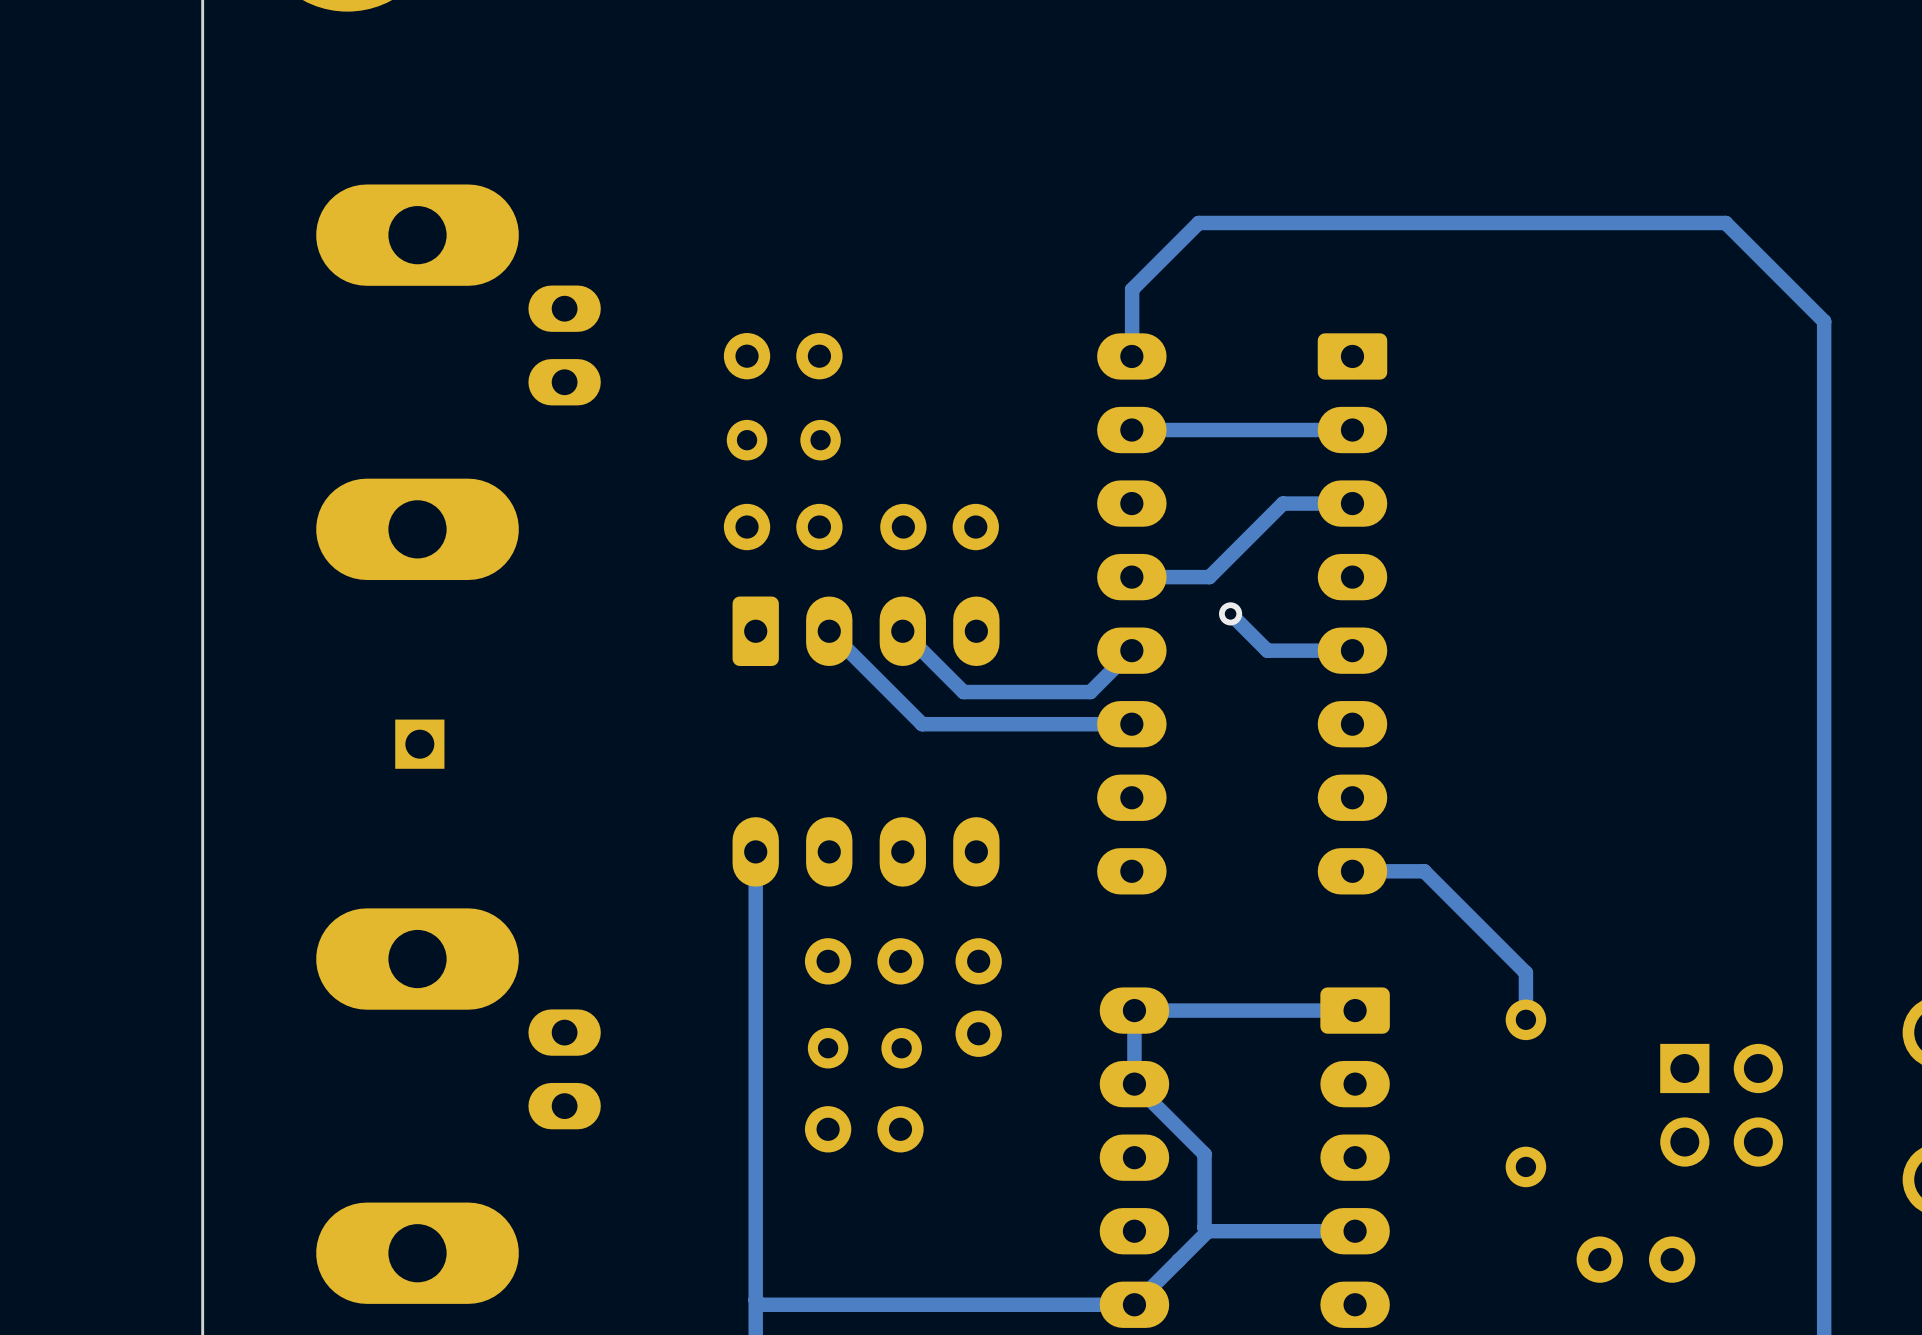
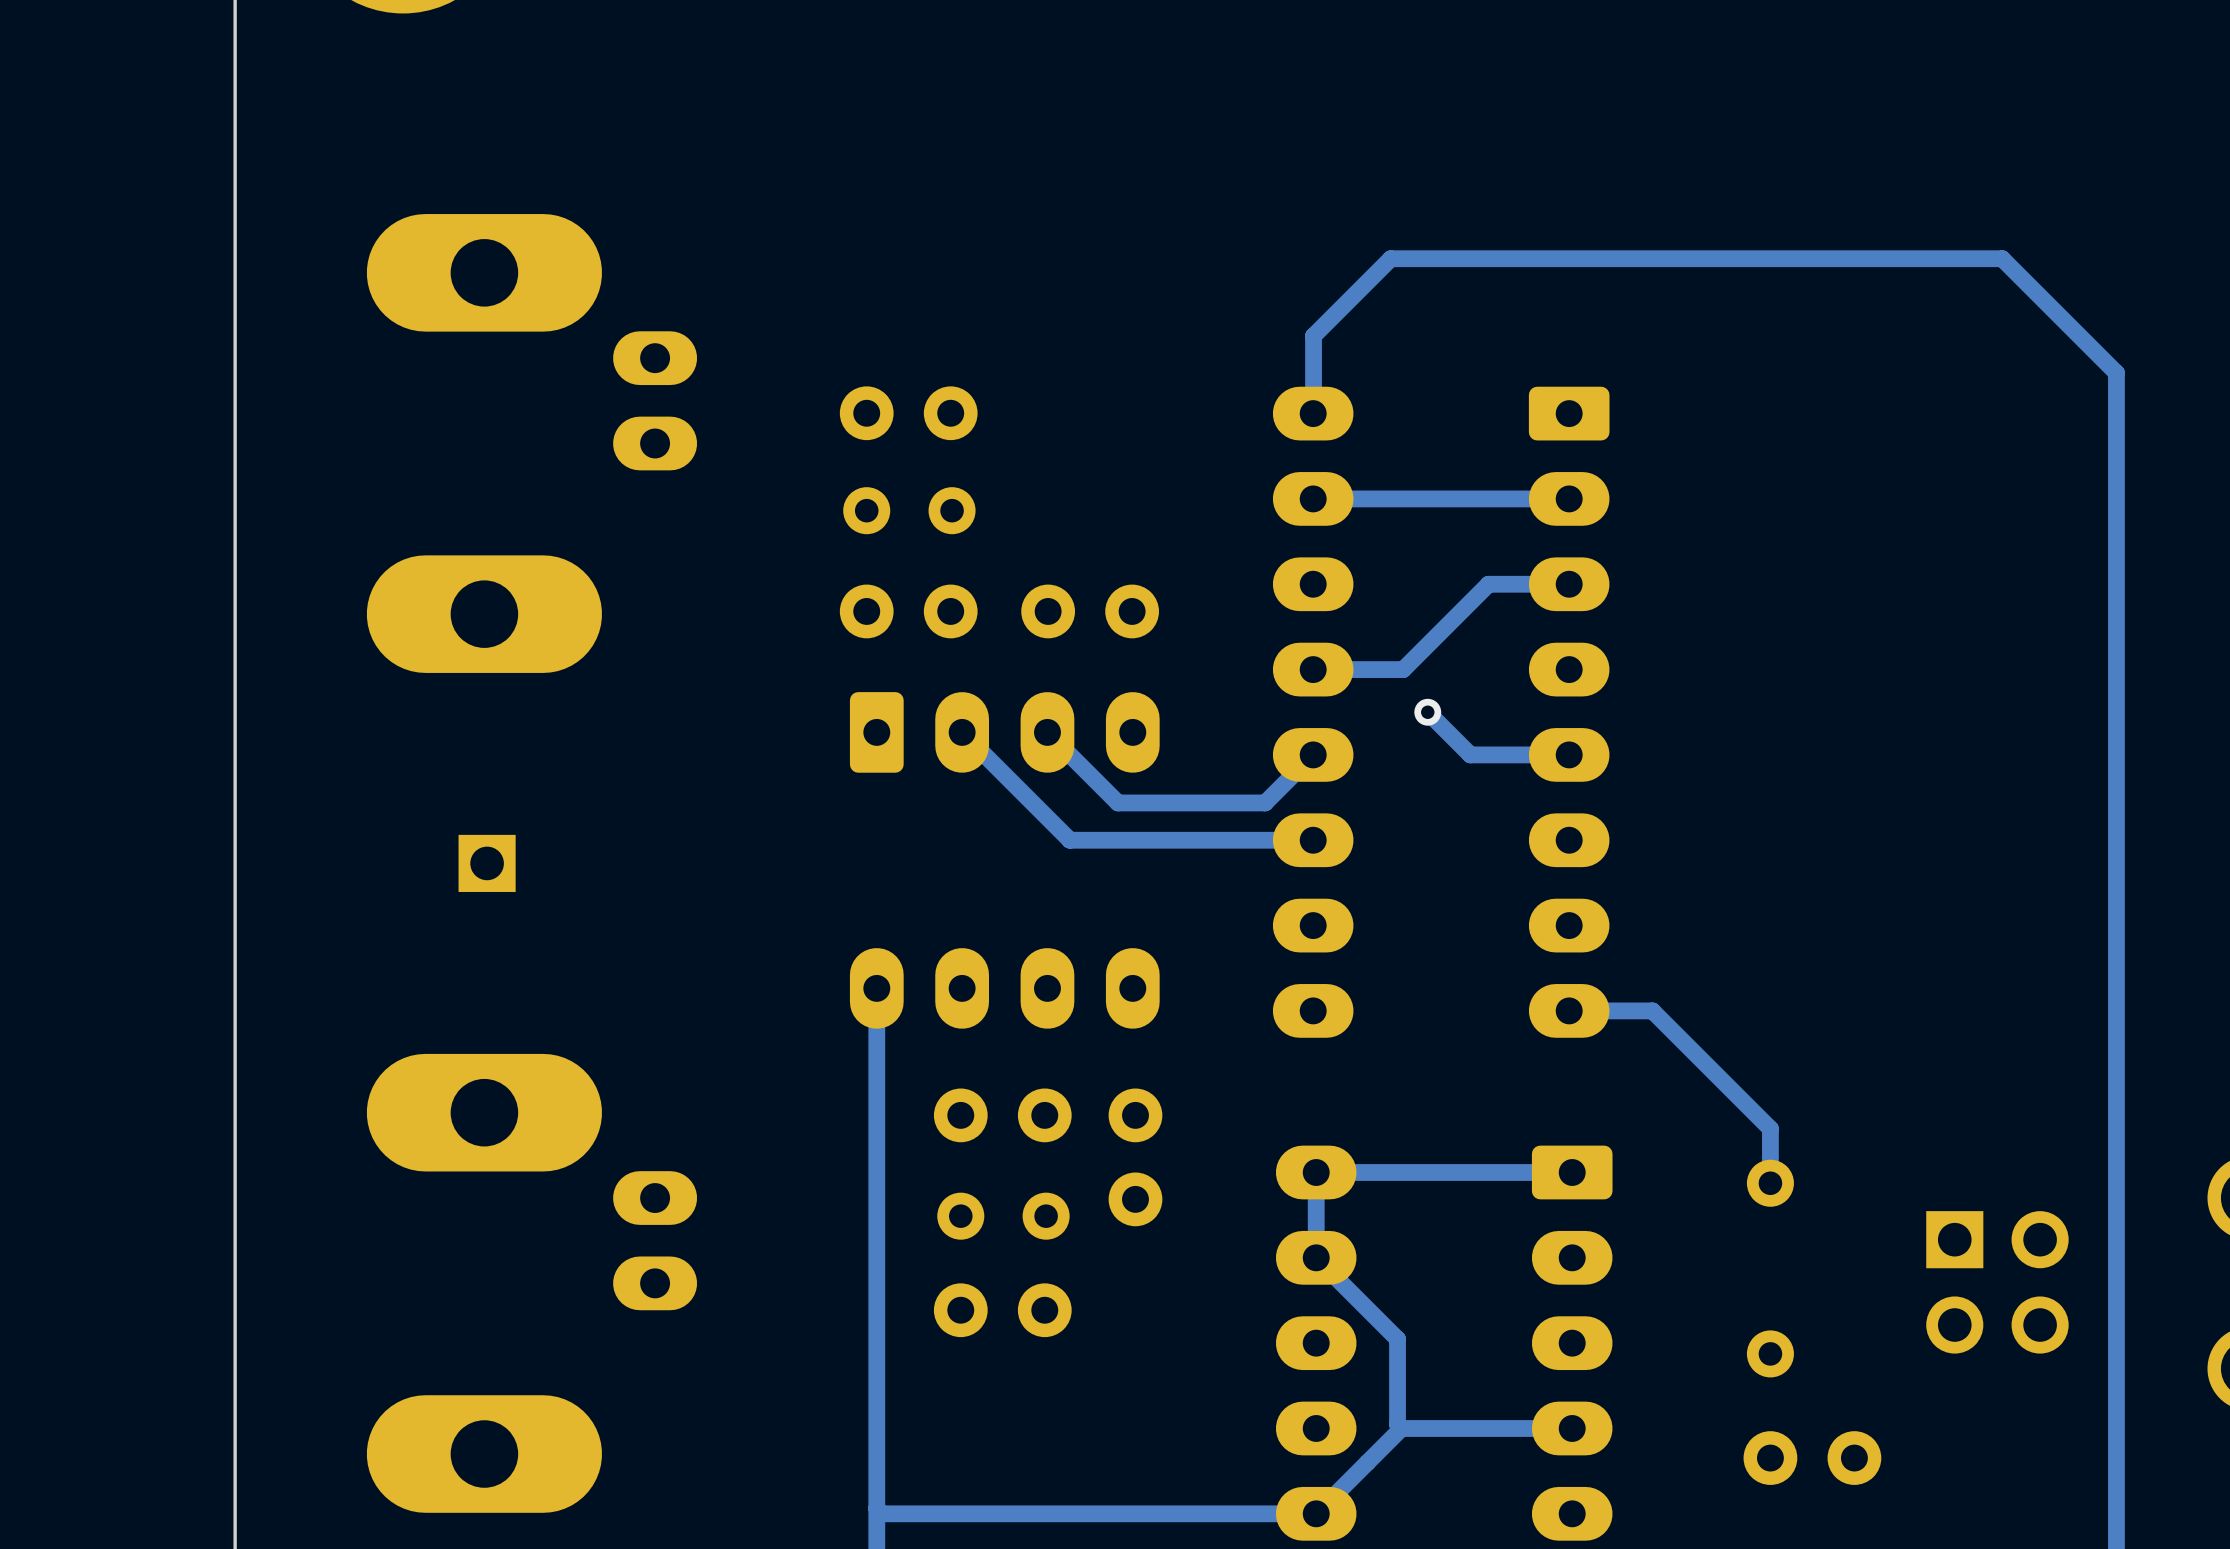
part position: (1635, 1259) -> (1812, 1458)

